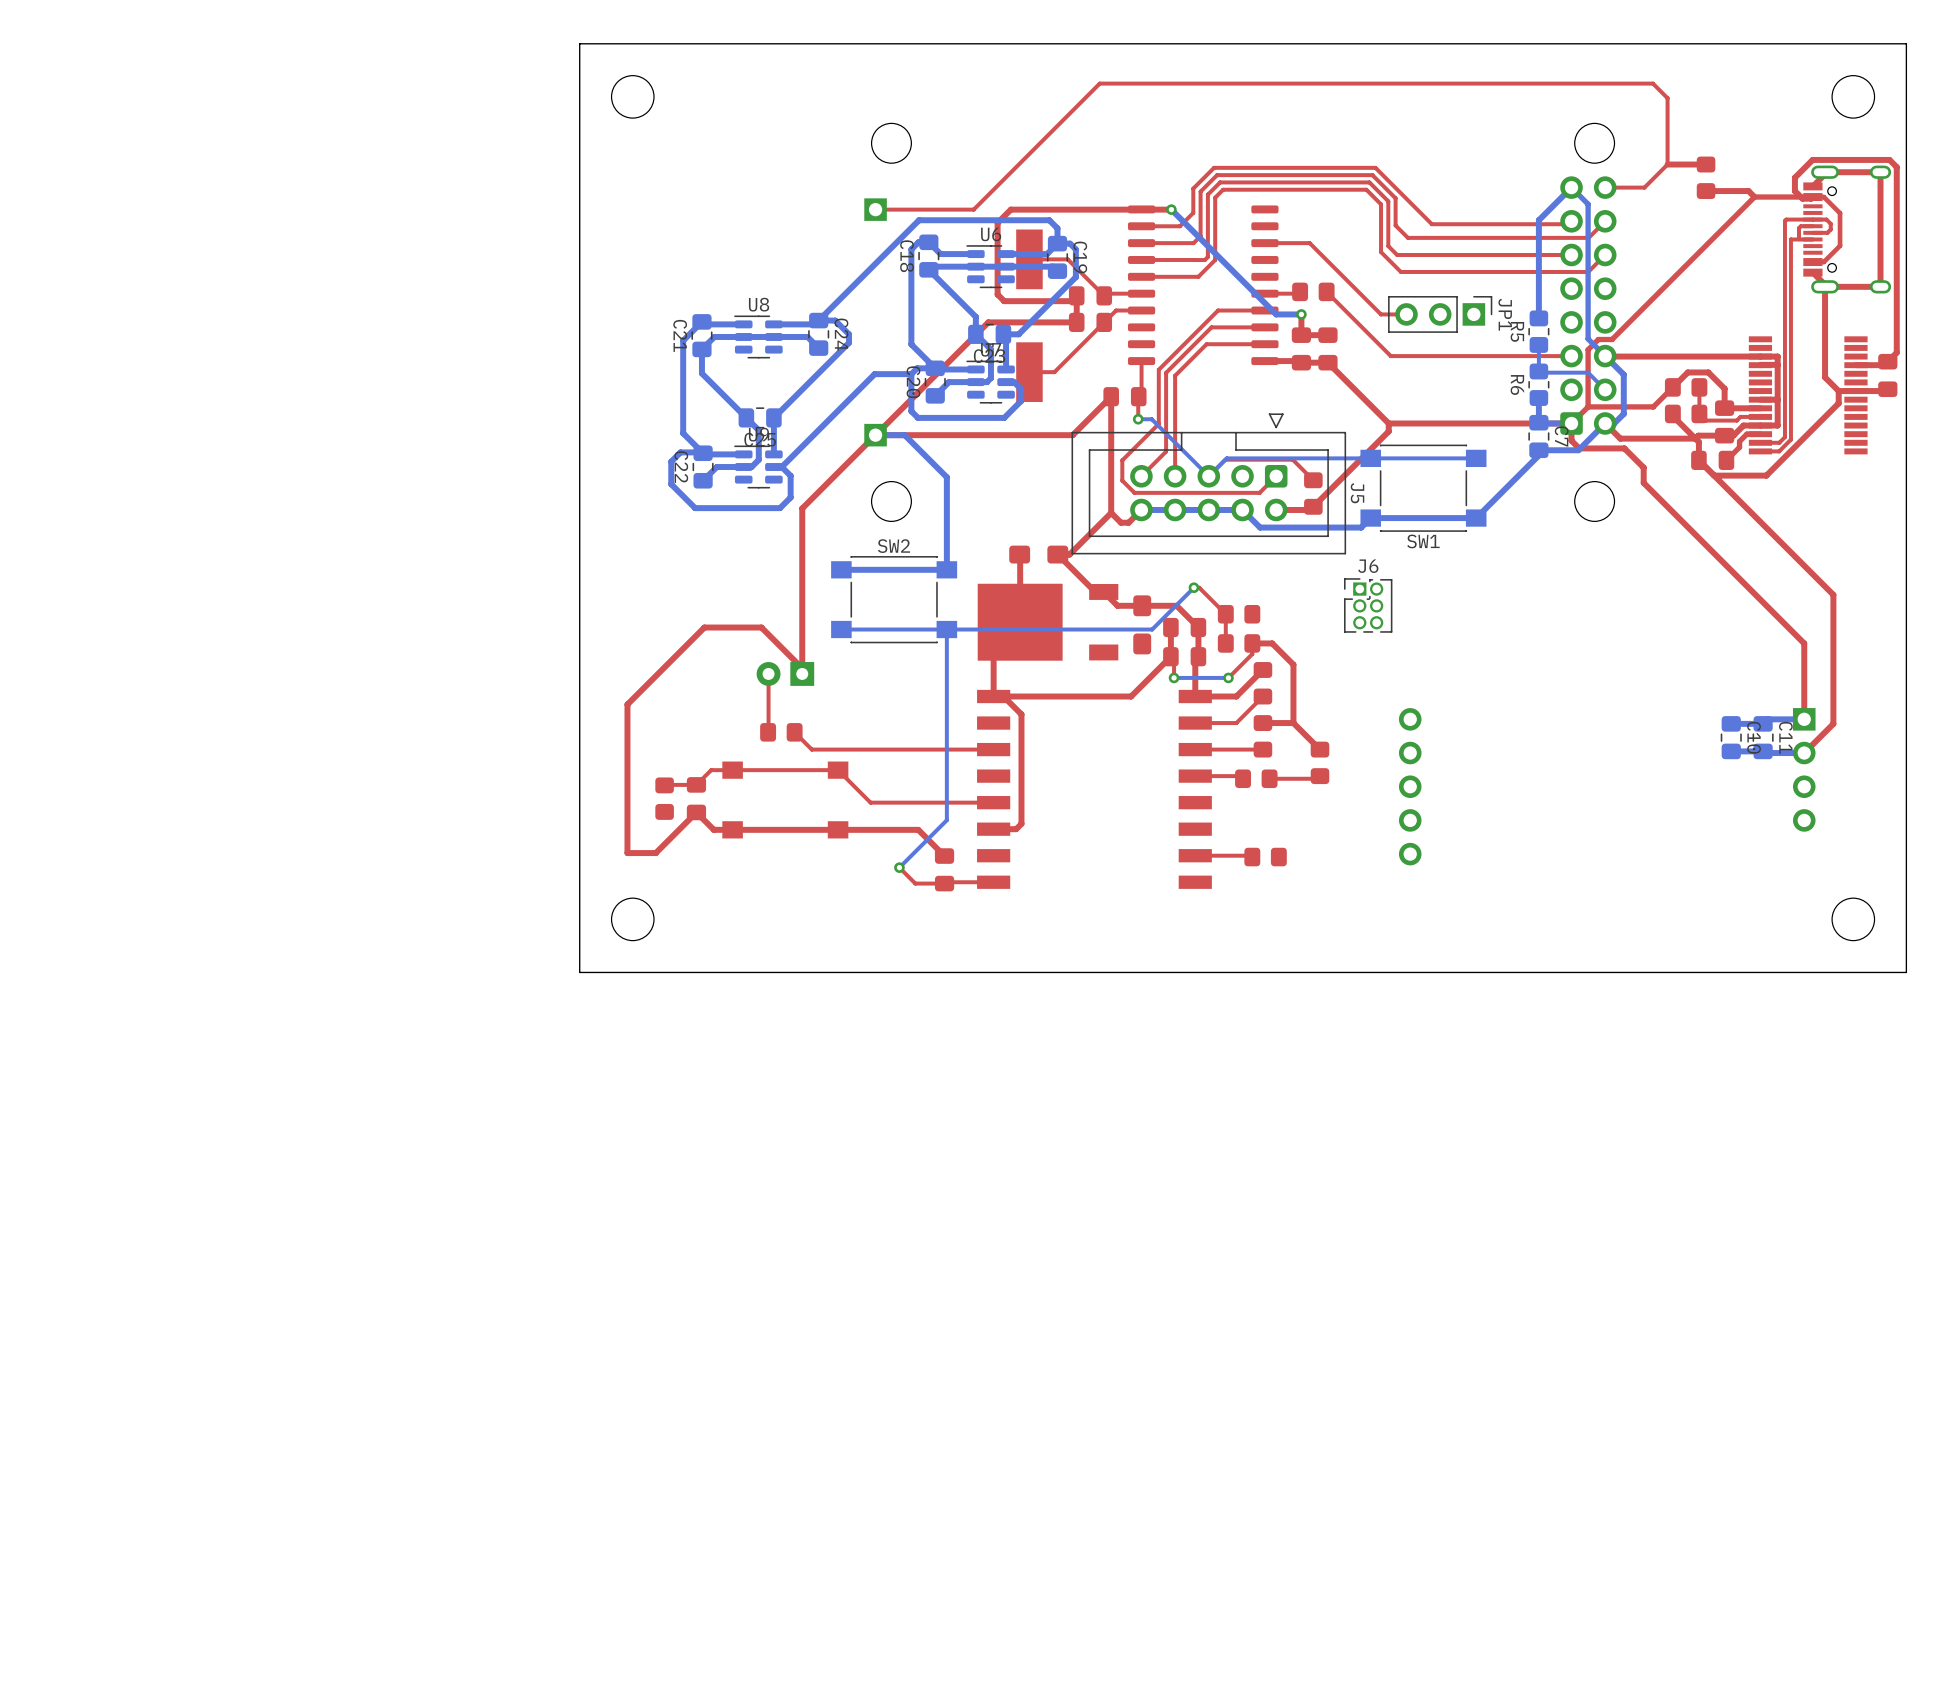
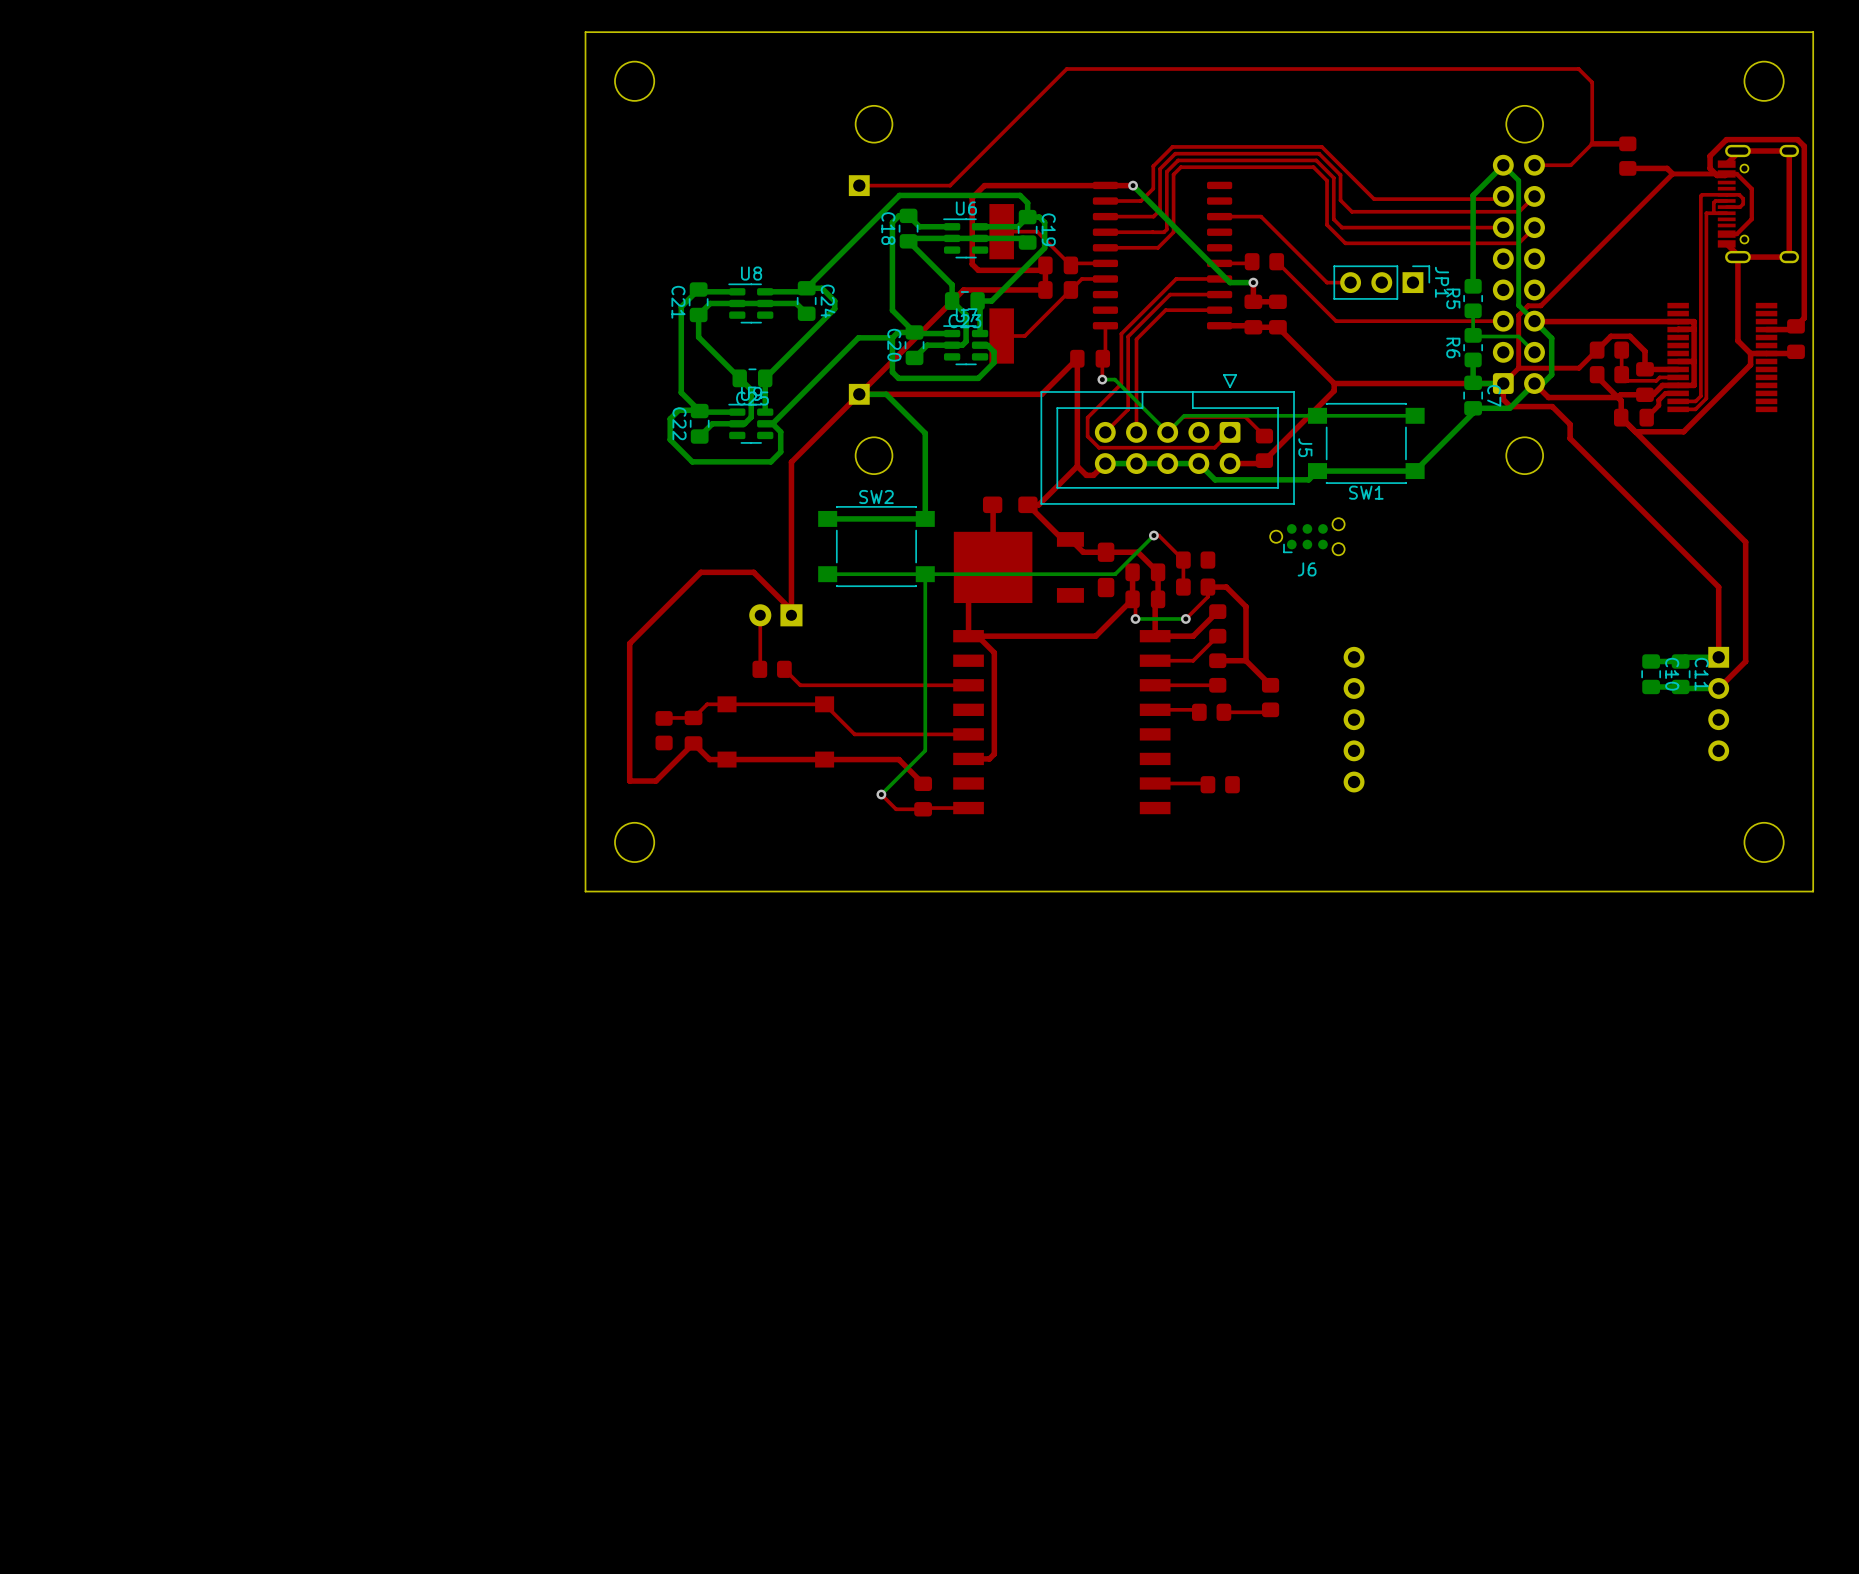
J6 name position: J6 (1368, 566) -> J6 (1307, 569)
J6 footprint: [1344, 578, 1393, 633] -> [1270, 518, 1345, 556]

